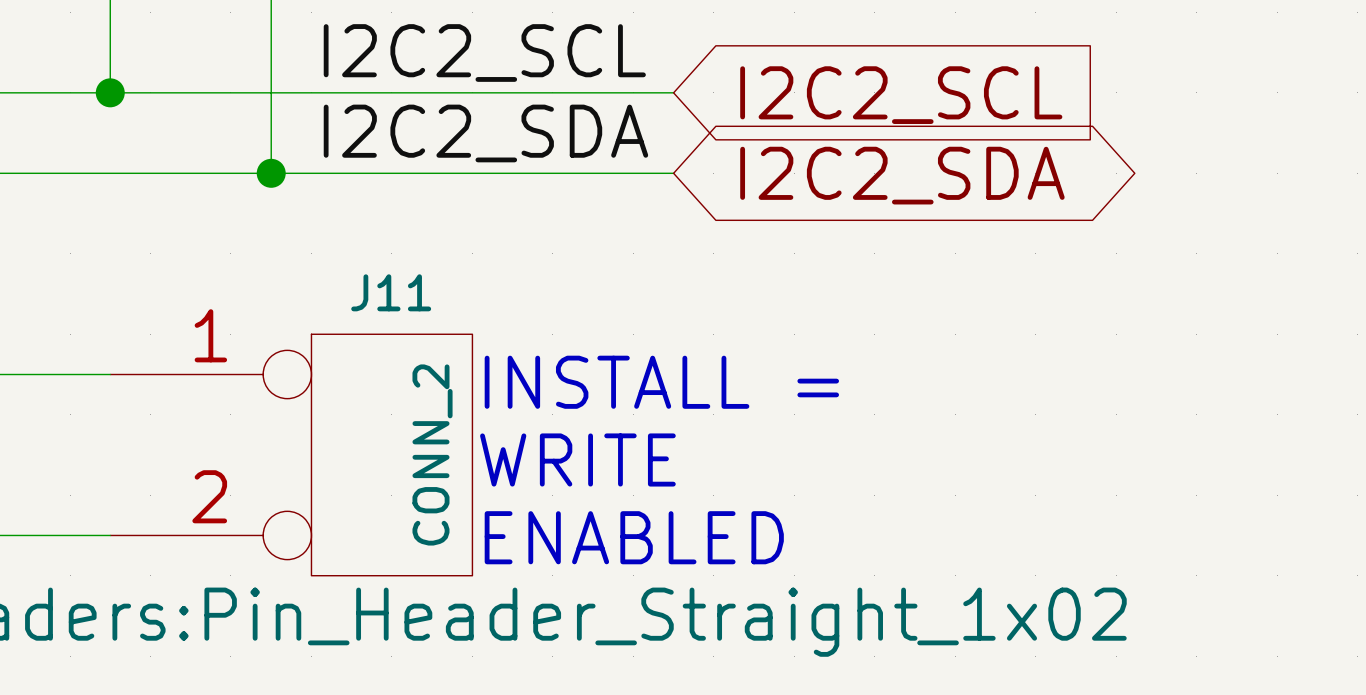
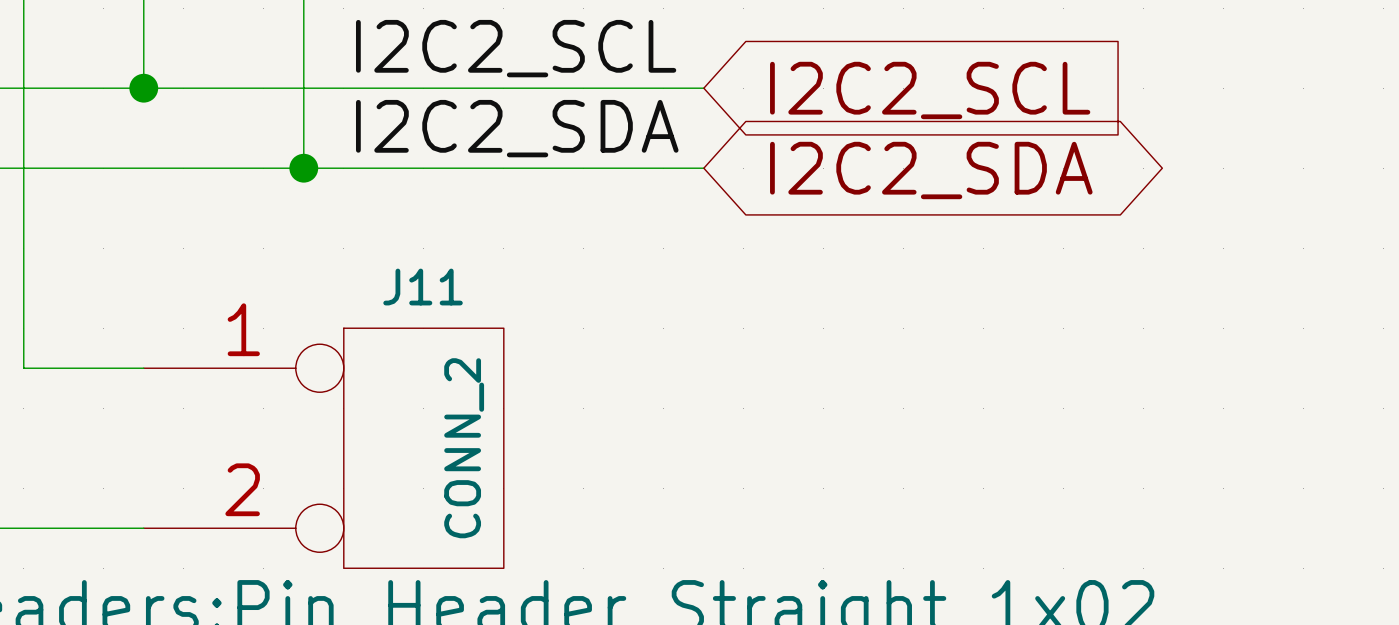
text: INSTALL = (661, 382) -> none
text: WRITE (577, 459) -> none
text: ENABLED (634, 537) -> none

